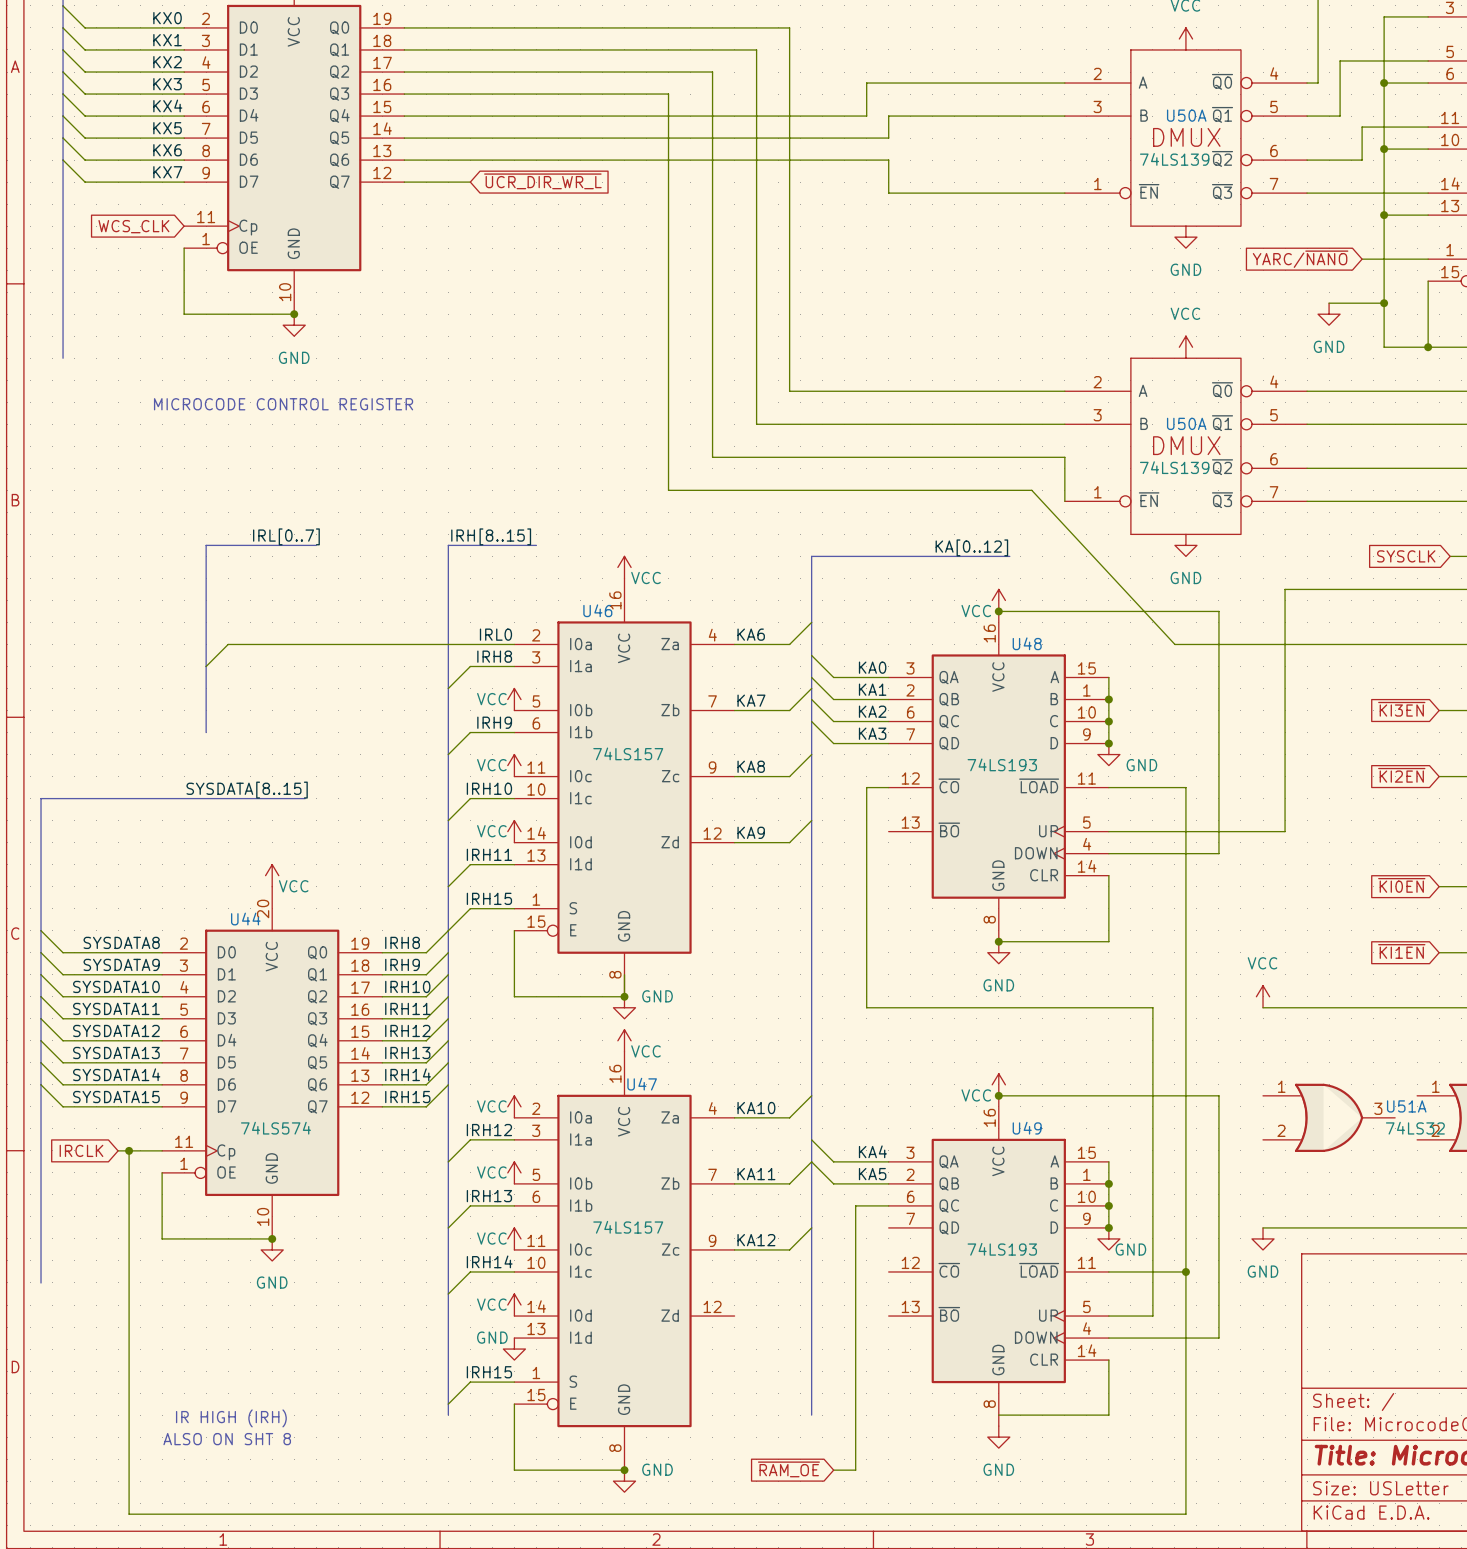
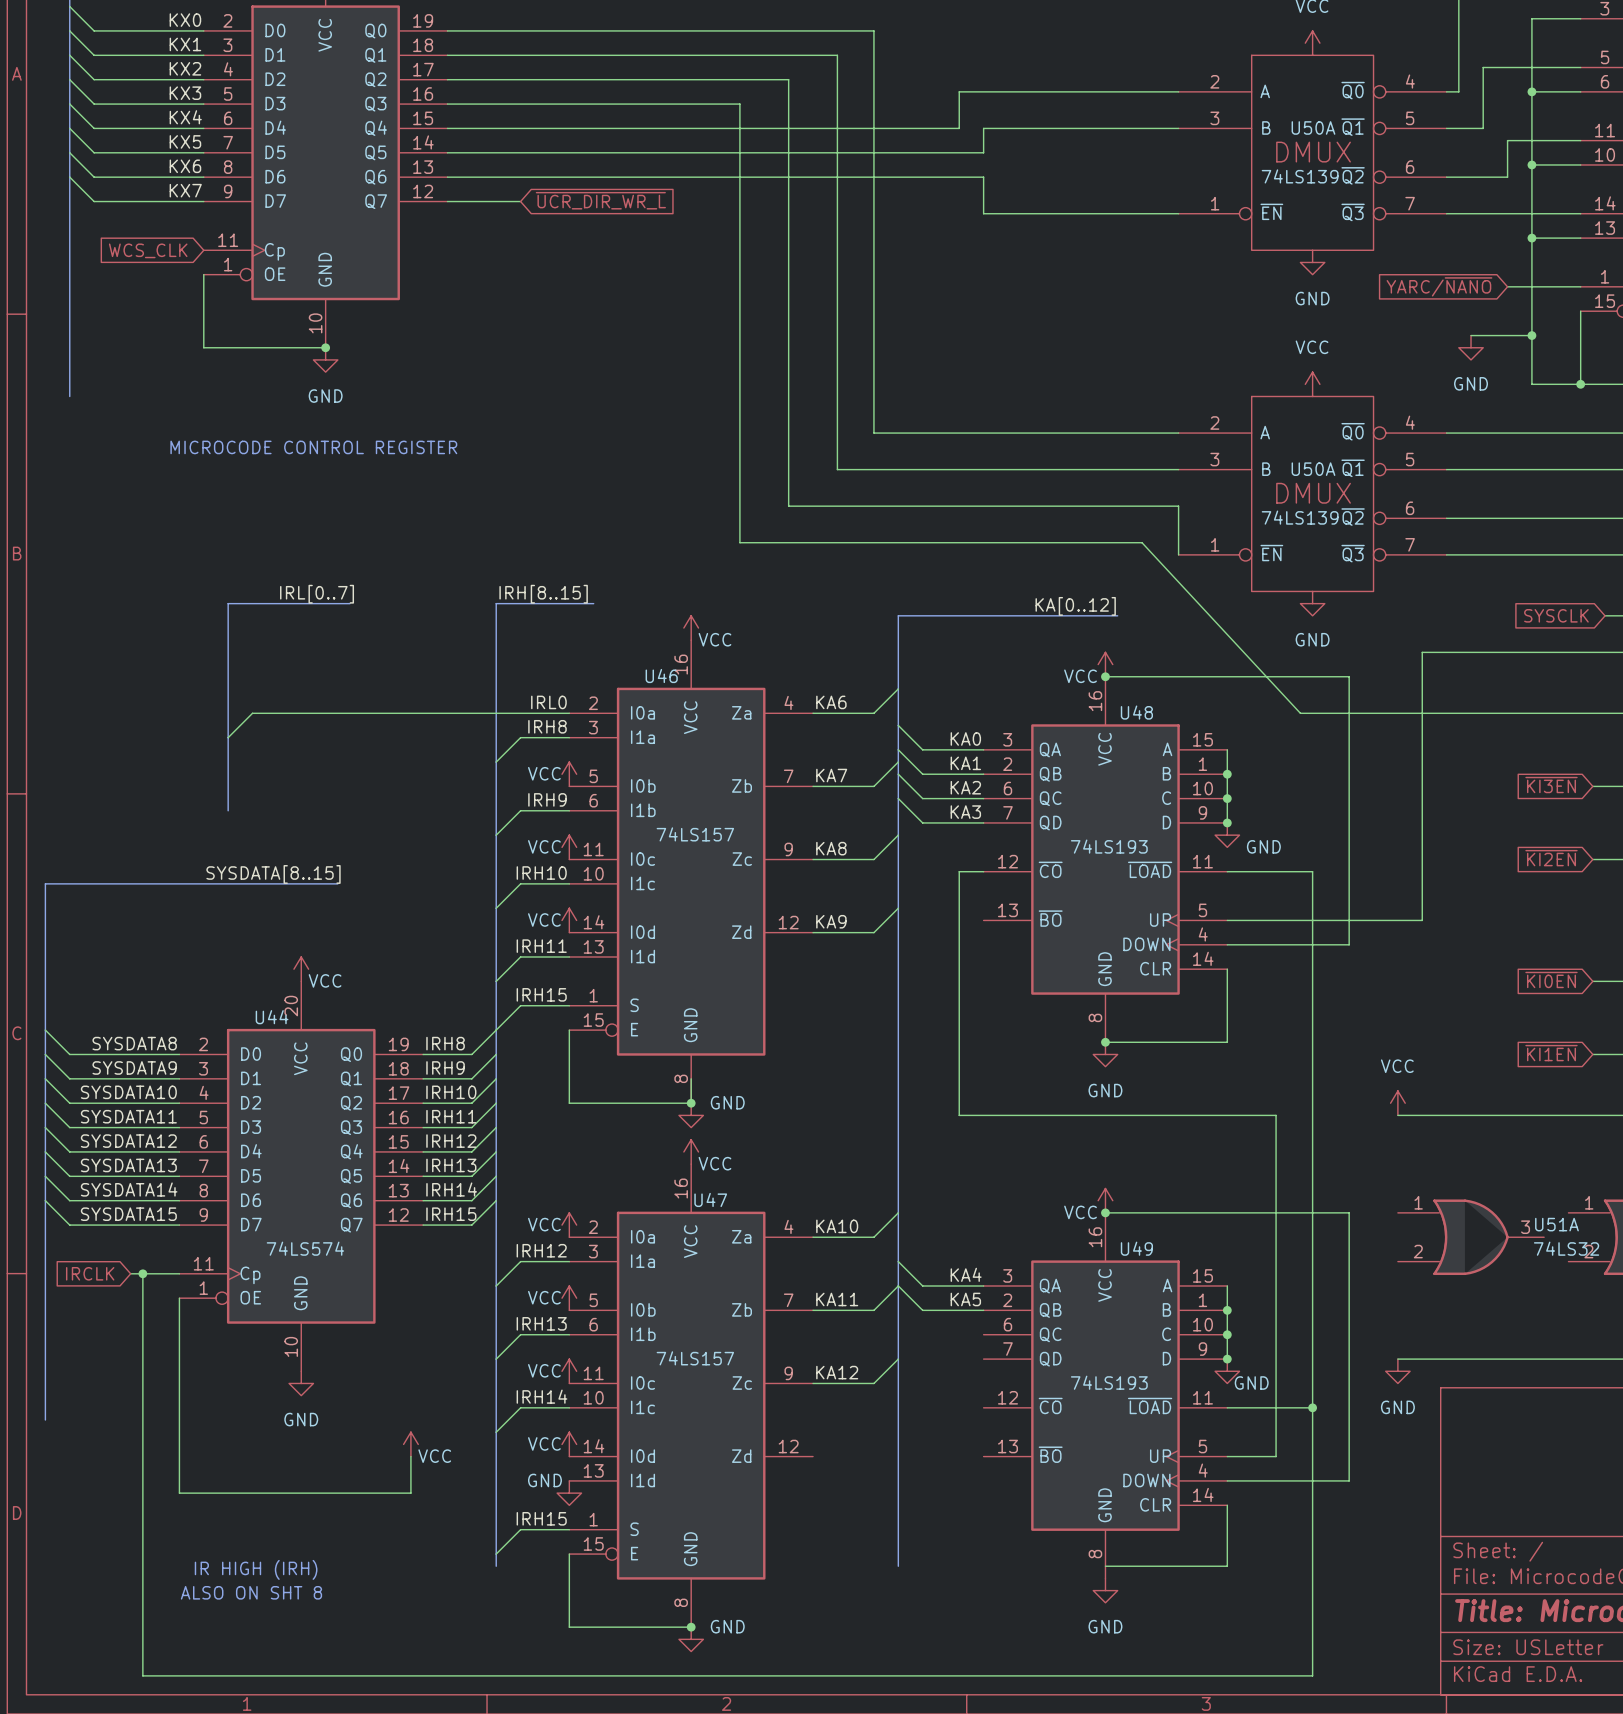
wire: (888, 1205) (855, 1205) (855, 1470) (833, 1470) -> none
wire: (162, 1238) (272, 1238) -> (179, 1371) (179, 1493) (410, 1493) (410, 1456)
junction: (272, 1238) -> none
power symbol: none -> VCC (410, 1444)
global label: ~{RAM_OE} (788, 1469) -> none

